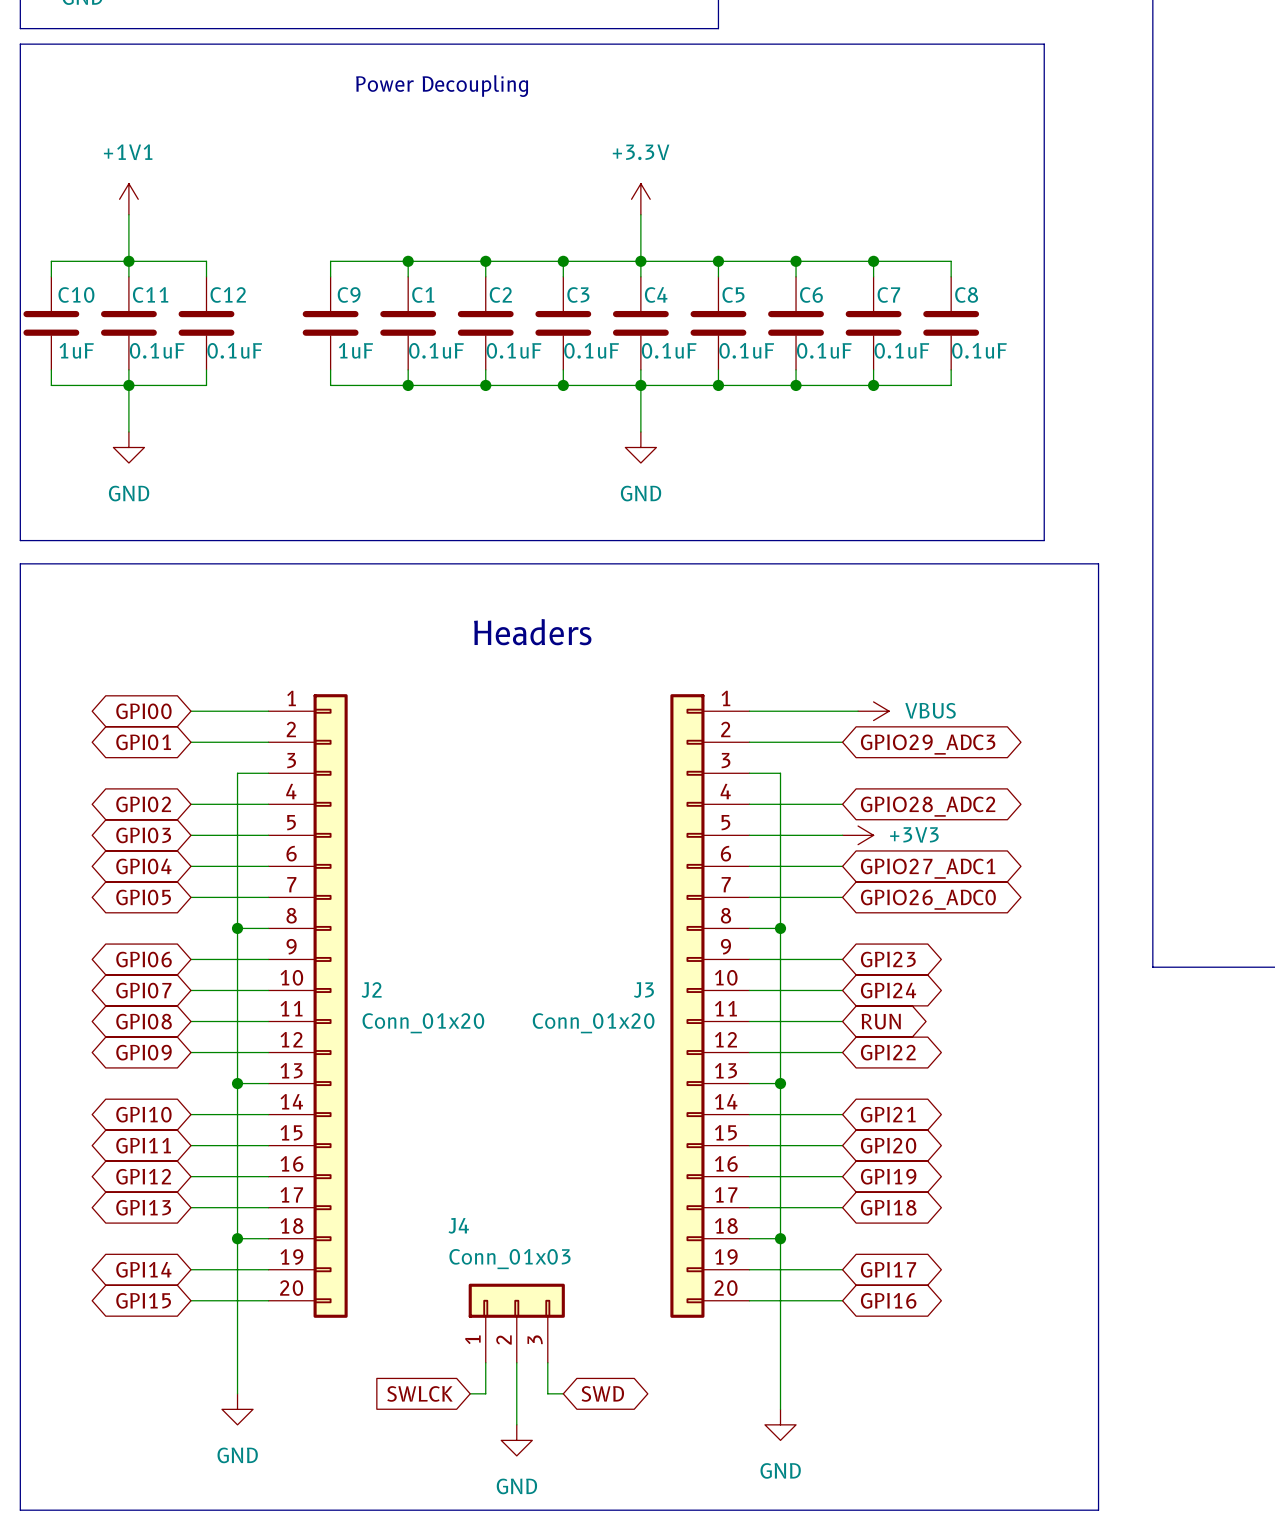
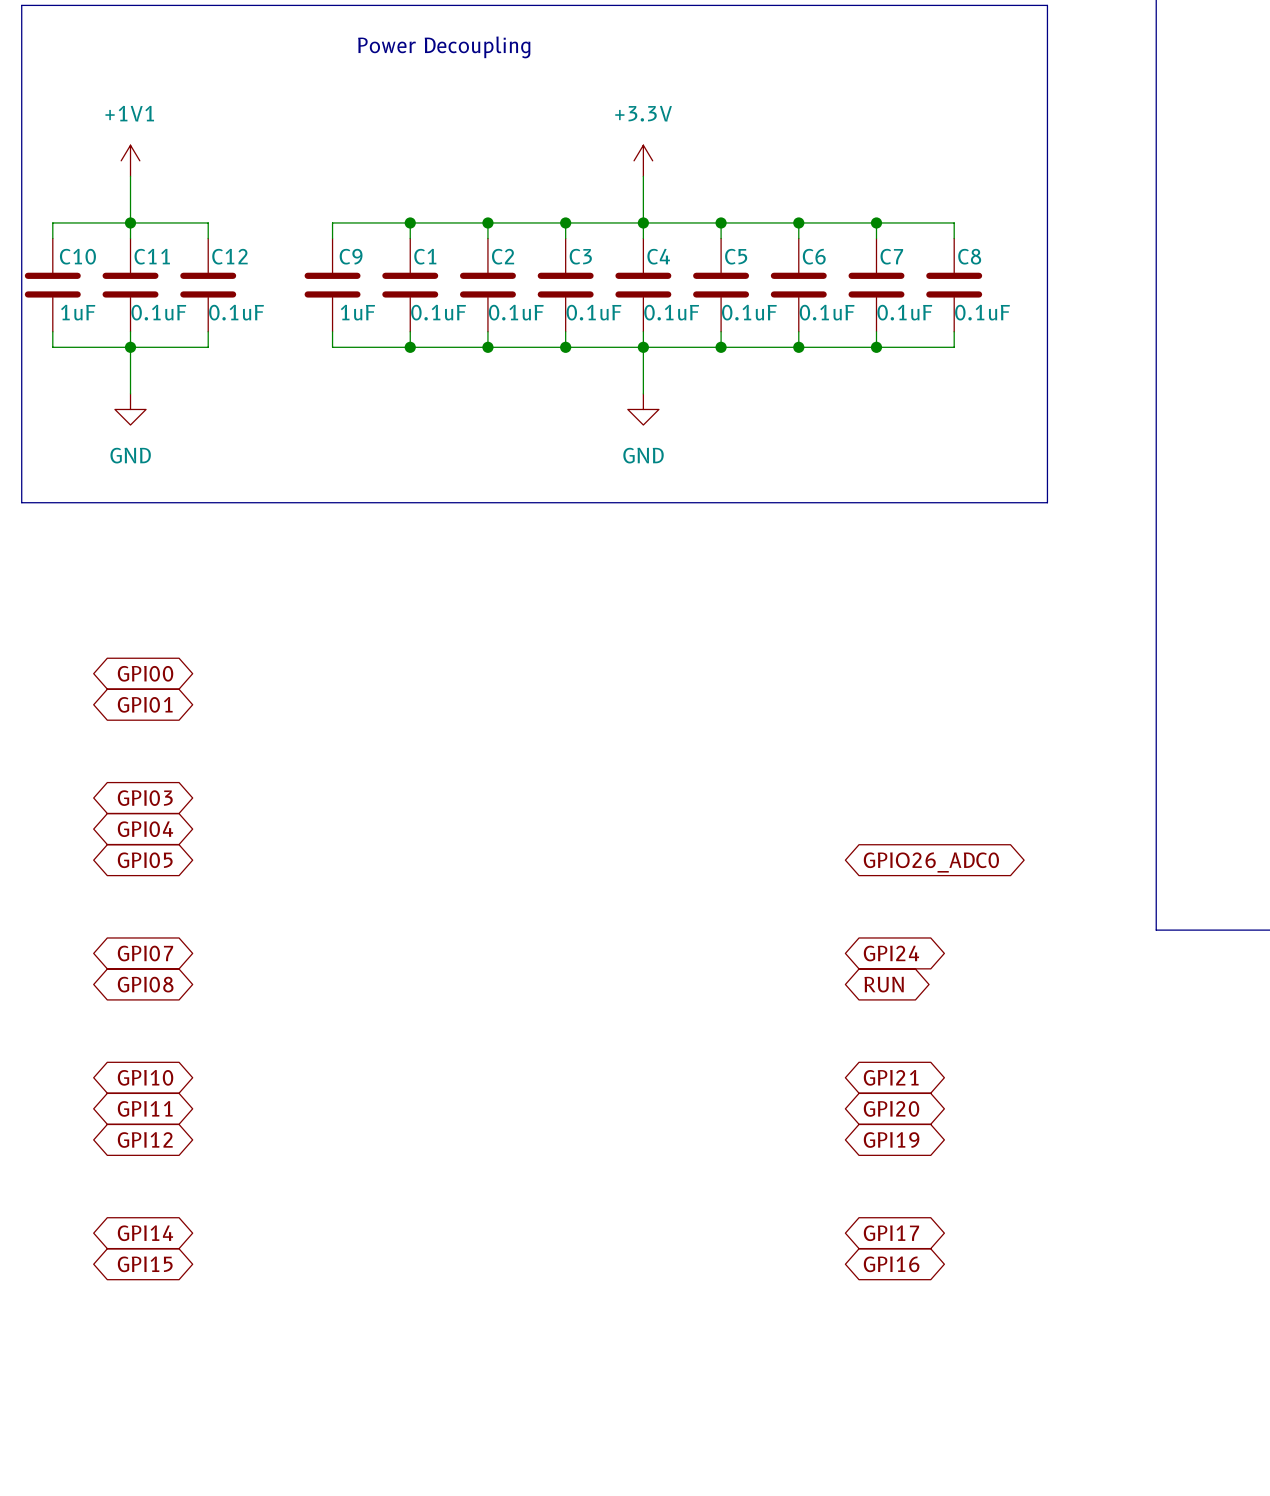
line: (20, 563) (20, 1510) (1098, 1510) (1098, 563) (20, 563) -> none
text: Headers (532, 632) -> none
wire: (190, 711) (268, 711) -> none
wire: (749, 711) (858, 711) -> none
power symbol: VBUS (873, 711) -> none
wire: (190, 742) (268, 742) -> none
wire: (749, 742) (842, 742) -> none
global label: GPIO29_ADC3 (928, 744) -> none
wire: (268, 773) (237, 773) (237, 1393) -> none
wire: (749, 773) (780, 773) (780, 1409) -> none
global label: GPI02 (143, 804) -> none
wire: (190, 804) (268, 804) -> none
wire: (749, 804) (842, 804) -> none
global label: GPIO28_ADC2 (928, 806) -> none
wire: (190, 835) (268, 835) -> none
wire: (749, 835) (842, 835) -> none
power symbol: +3V3 (858, 835) -> none
wire: (190, 866) (268, 866) -> none
wire: (749, 866) (842, 866) -> none
global label: GPIO27_ADC1 (928, 868) -> none
wire: (190, 897) (268, 897) -> none
wire: (749, 897) (842, 897) -> none
wire: (237, 928) (268, 928) -> none
junction: (237, 928) -> none
wire: (749, 928) (780, 928) -> none
junction: (780, 928) -> none
global label: GPI06 (144, 959) -> none
wire: (190, 959) (268, 959) -> none
wire: (749, 959) (842, 959) -> none
global label: GPI23 (888, 959) -> none
wire: (190, 990) (268, 990) -> none
wire: (749, 990) (842, 990) -> none
J2: Conn_01x20 (308, 1005) -> none
J3: Conn_01x20 (709, 1005) -> none
wire: (190, 1021) (268, 1021) -> none
wire: (749, 1021) (842, 1021) -> none
global label: GPI09 (143, 1052) -> none
wire: (190, 1052) (268, 1052) -> none
wire: (749, 1052) (842, 1052) -> none
global label: GPI22 (888, 1052) -> none
wire: (237, 1083) (268, 1083) -> none
junction: (237, 1083) -> none
wire: (749, 1083) (780, 1083) -> none
junction: (780, 1083) -> none
wire: (190, 1114) (268, 1114) -> none
wire: (749, 1114) (842, 1114) -> none
wire: (190, 1145) (268, 1145) -> none
wire: (749, 1145) (842, 1145) -> none
wire: (190, 1176) (268, 1176) -> none
wire: (749, 1176) (842, 1176) -> none
global label: GPI13 (143, 1207) -> none
wire: (190, 1207) (268, 1207) -> none
wire: (749, 1207) (842, 1207) -> none
global label: GPI18 (888, 1207) -> none
wire: (237, 1238) (268, 1238) -> none
junction: (237, 1238) -> none
wire: (749, 1238) (780, 1238) -> none
junction: (780, 1238) -> none
wire: (190, 1269) (268, 1269) -> none
wire: (749, 1269) (842, 1269) -> none
wire: (190, 1300) (268, 1300) -> none
wire: (749, 1300) (842, 1300) -> none
J4: Conn_01x03 (516, 1323) -> none
wire: (485, 1362) (485, 1393) (470, 1393) -> none
wire: (516, 1362) (516, 1424) -> none
wire: (547, 1362) (547, 1393) (563, 1393) -> none
global label: SWLCK (419, 1393) -> none
global label: SWD (602, 1393) -> none
power symbol: GND (237, 1409) -> none
power symbol: GND (780, 1424) -> none
power symbol: GND (516, 1440) -> none

